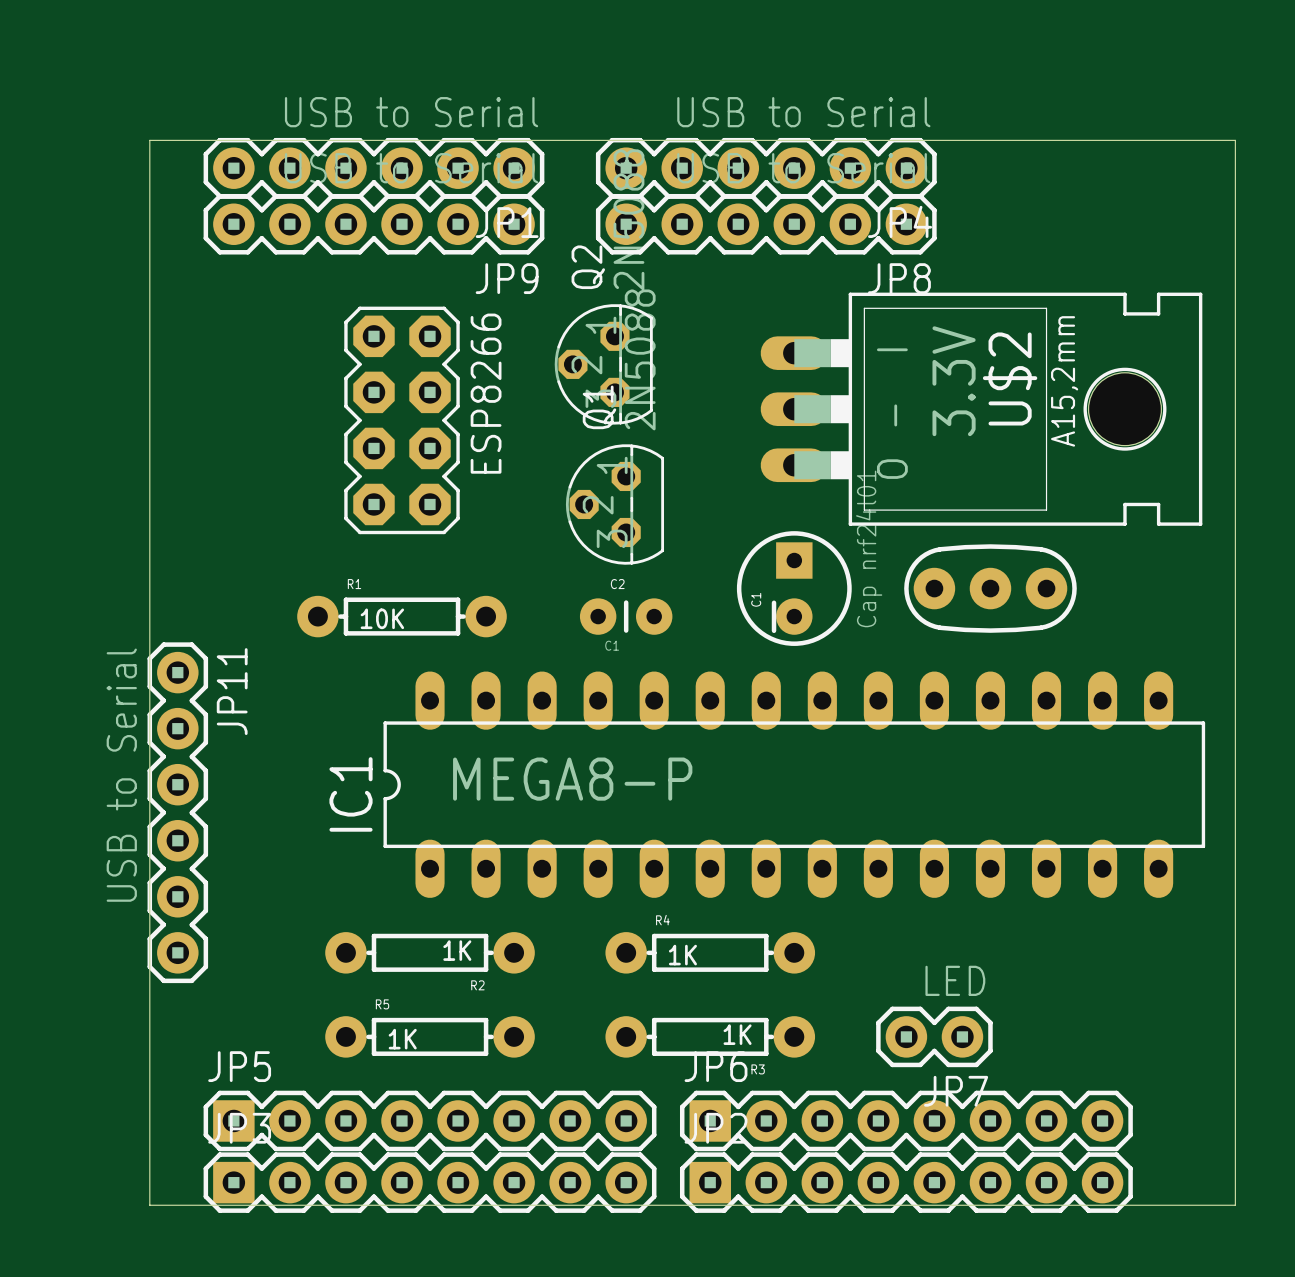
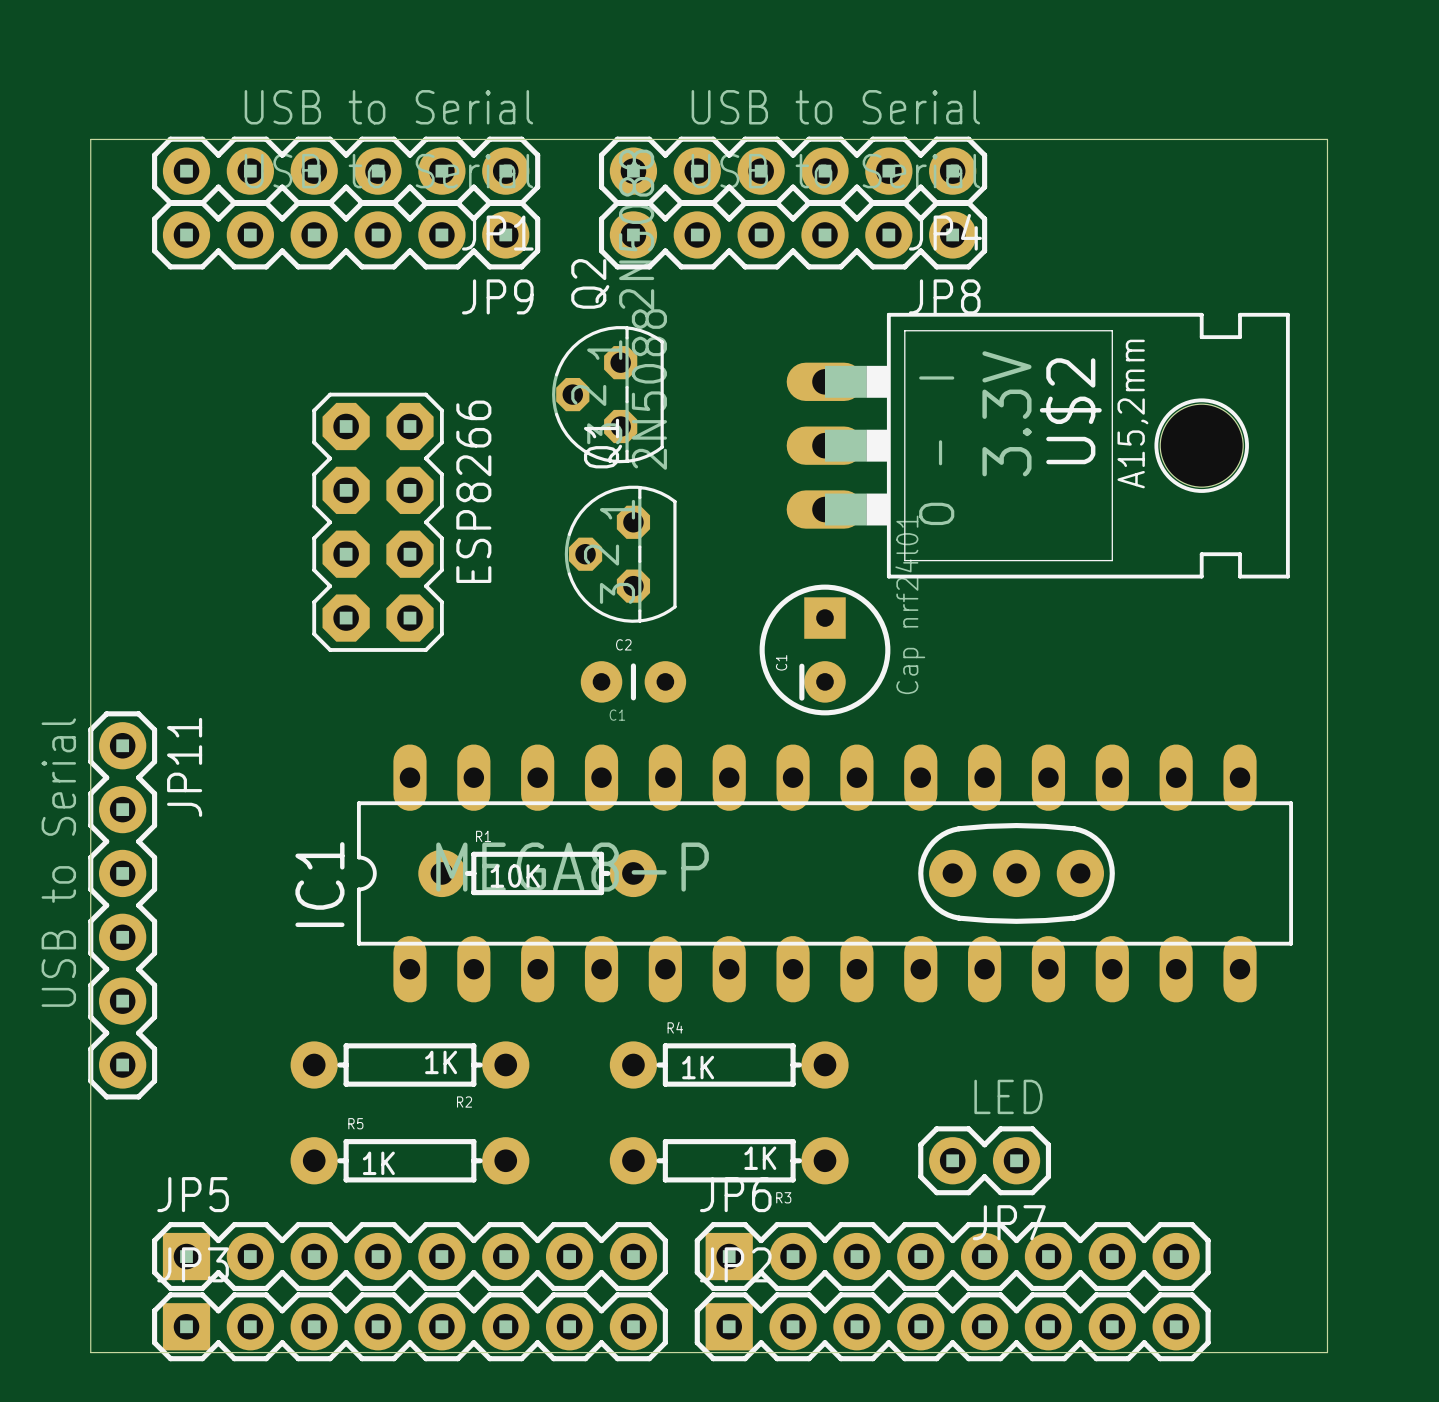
ESP8266 position: (402, 420) -> (378, 522)
part position: (990, 588) -> (1016, 873)
R1 position: (402, 616) -> (537, 873)

